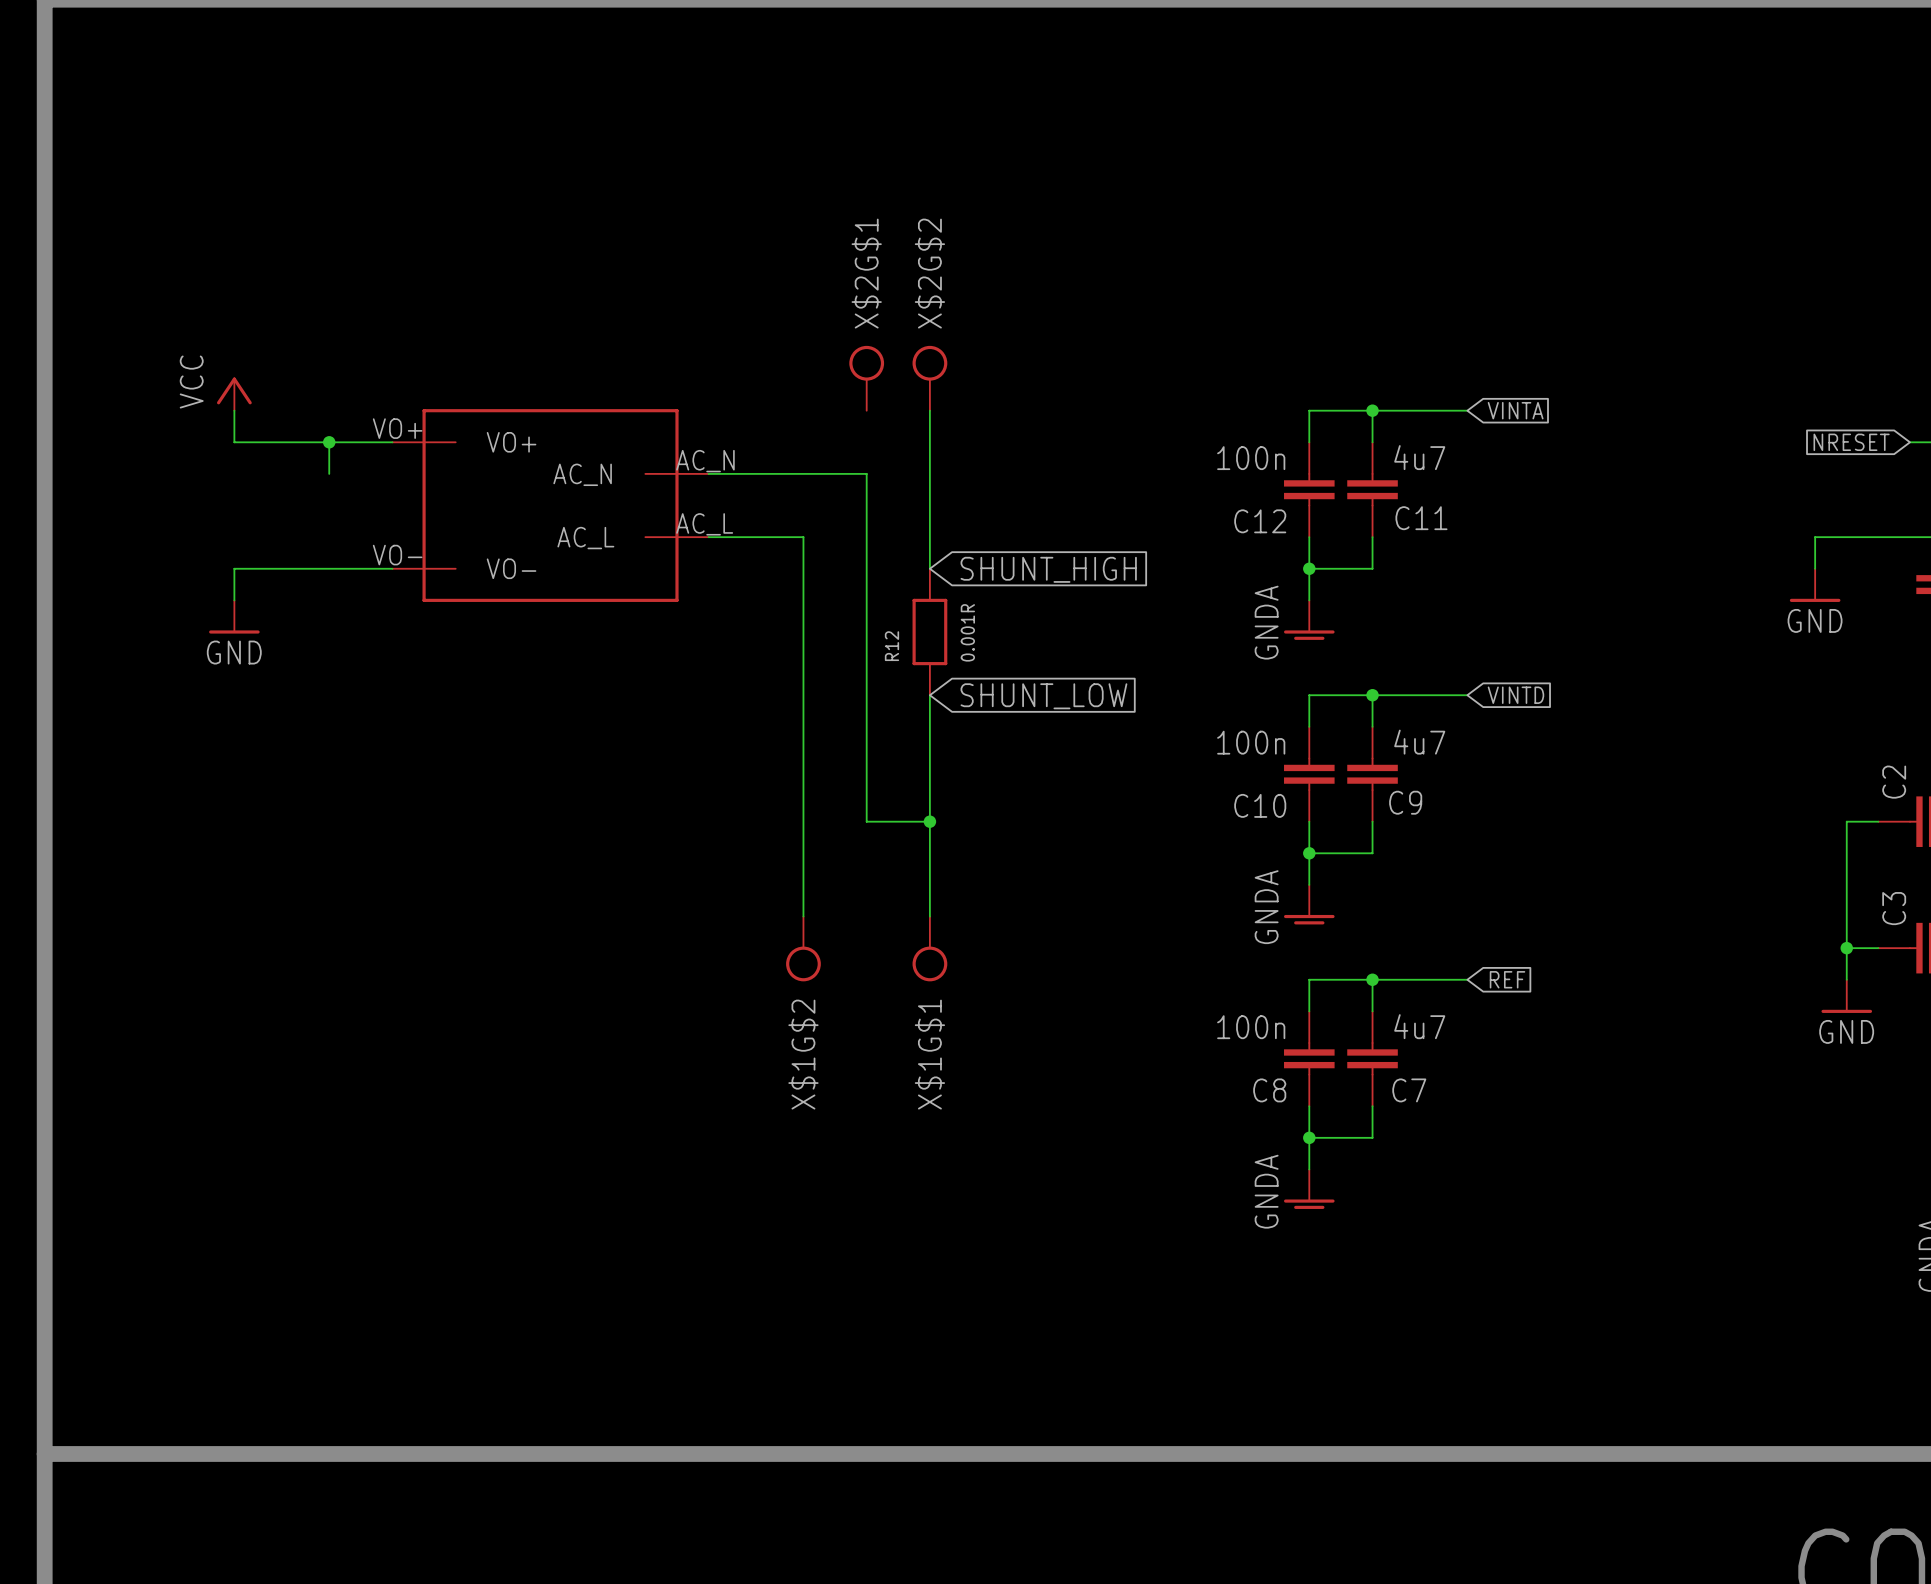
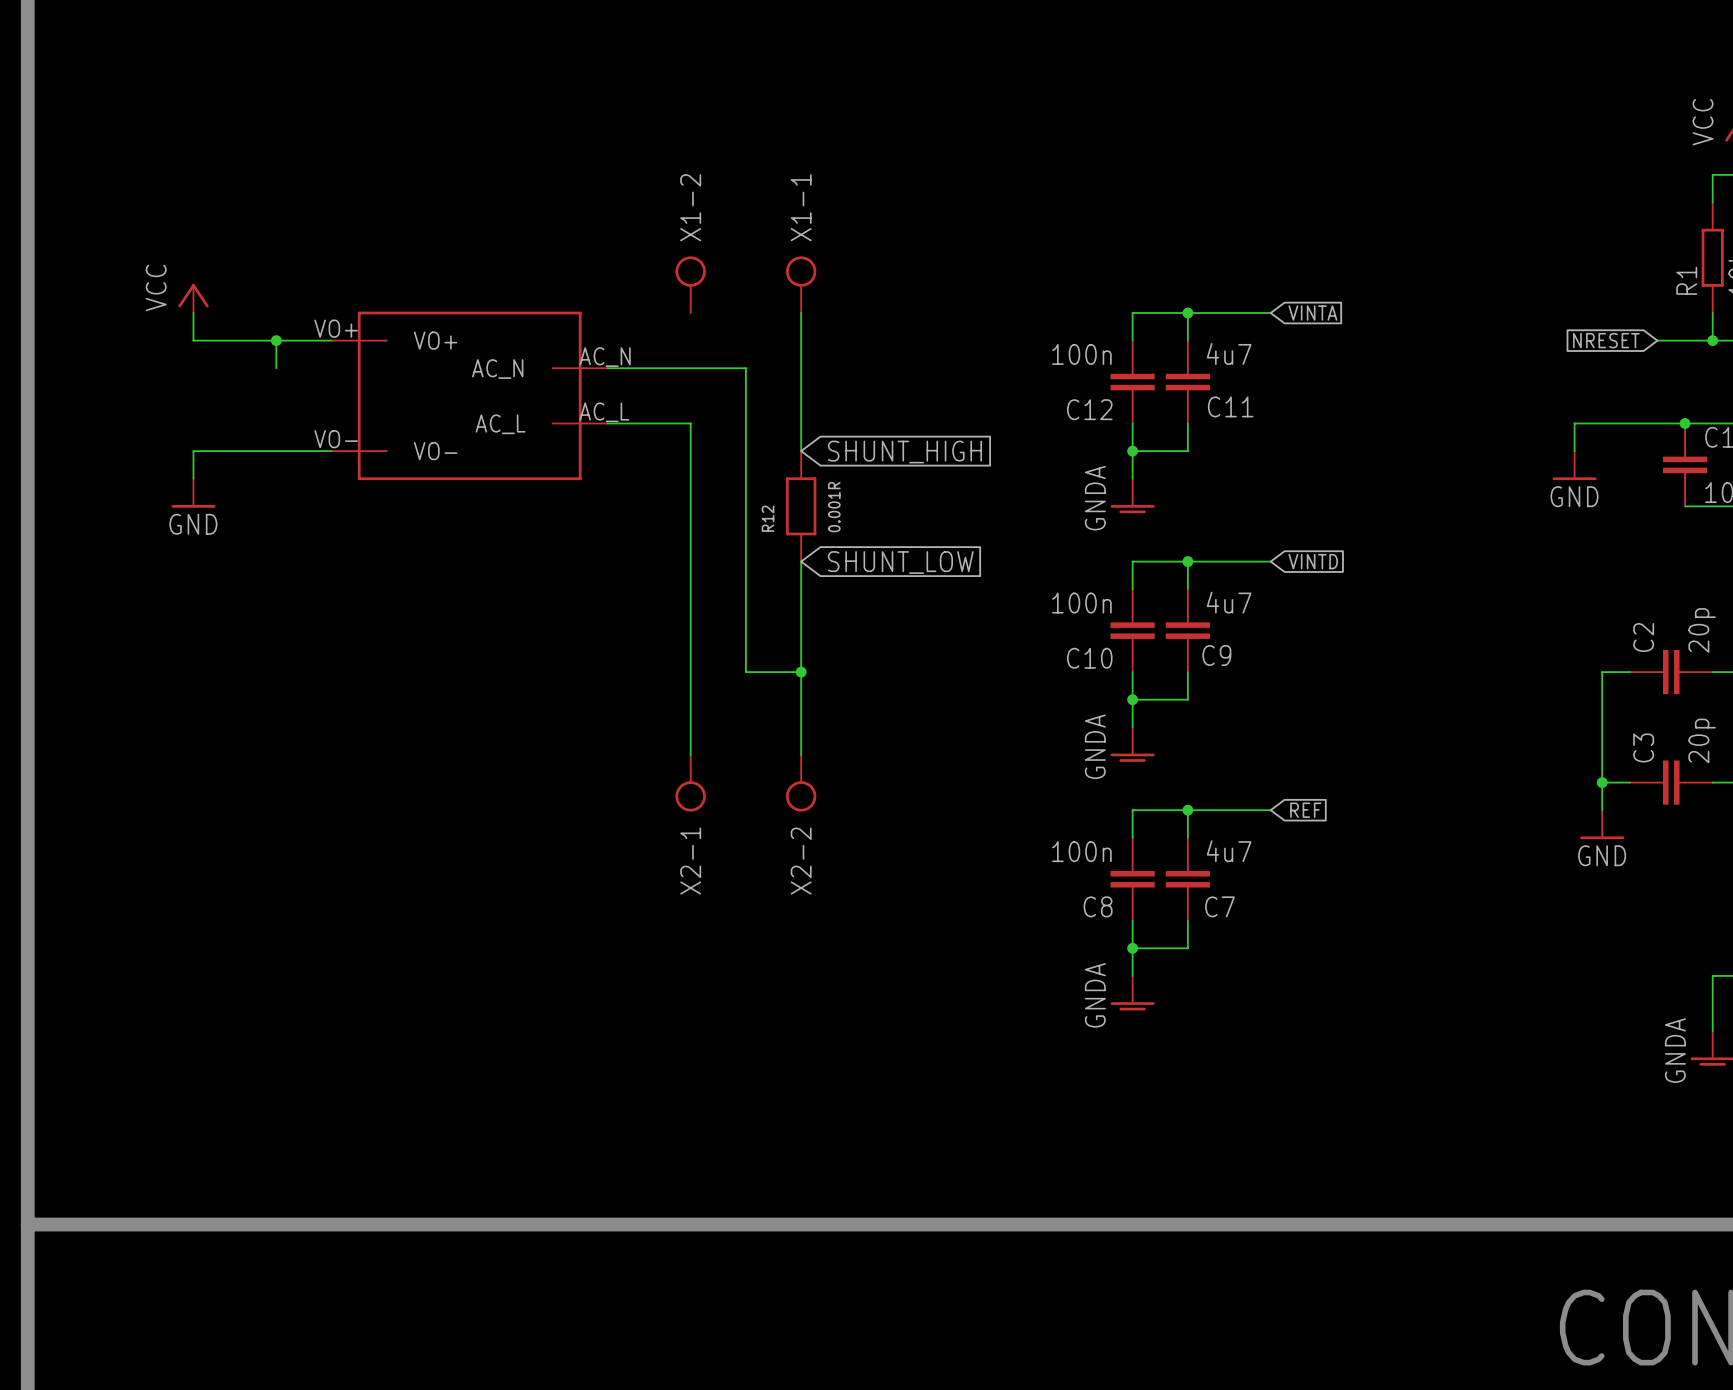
X$2G$2 name: X$2G$2 (929, 273) -> X1-1 (801, 207)
X1-2: none -> (690, 284)
X$2G$1: (866, 378) -> none
X$1G$2 name: X$1G$2 (803, 1054) -> X2-1 (690, 861)
X$1G$1 name: X$1G$1 (929, 1054) -> X2-2 (801, 861)

